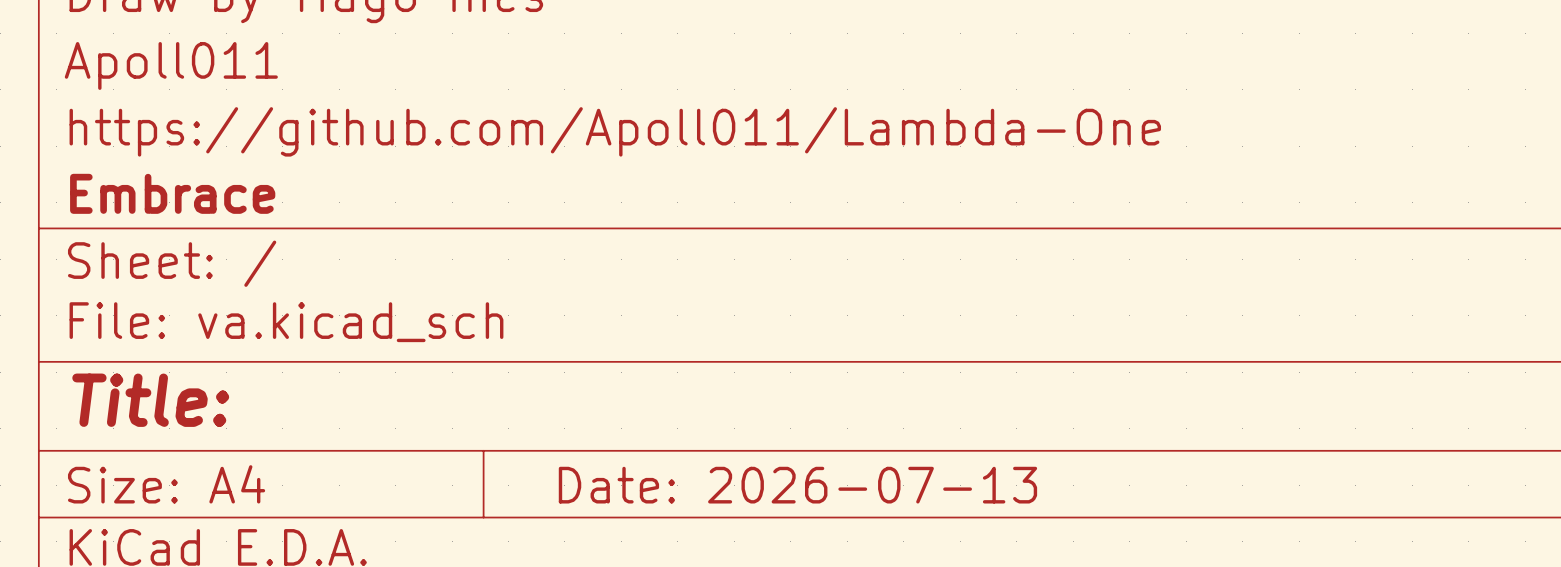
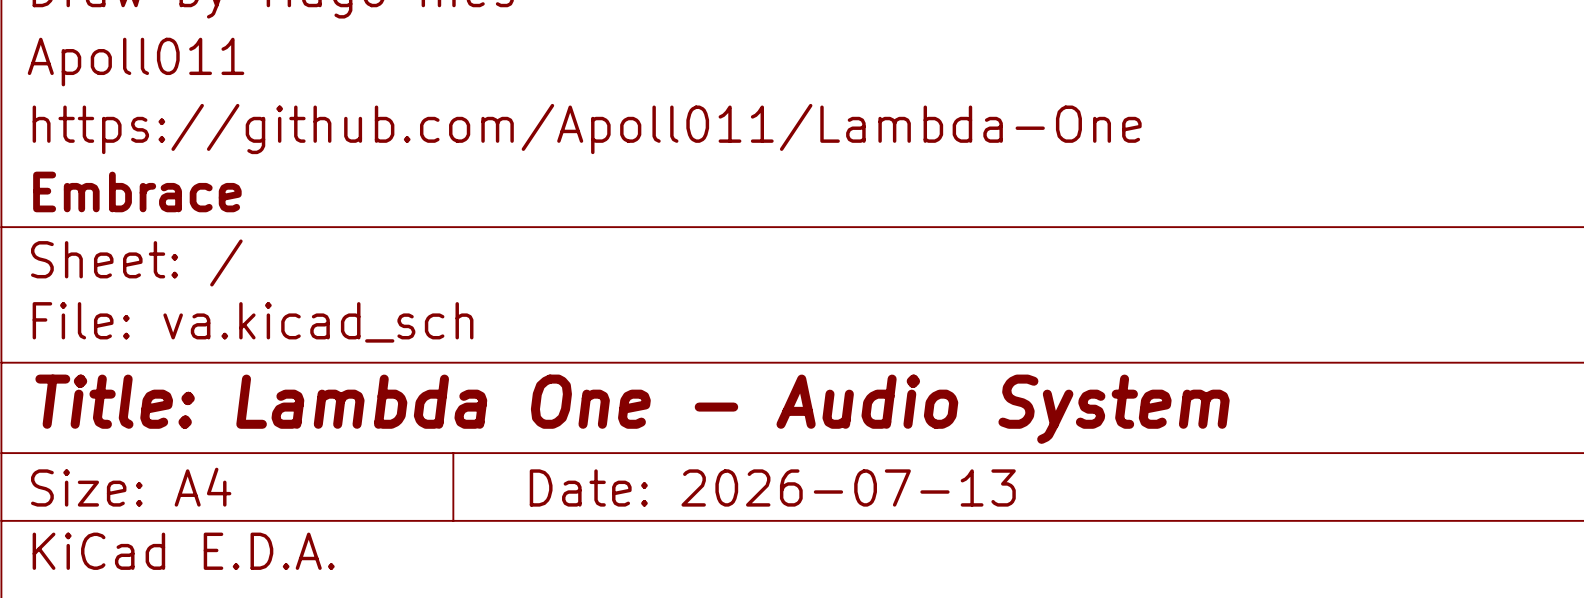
title block: Title: (150, 400) -> Title: Lambda One - Audio System (632, 409)

